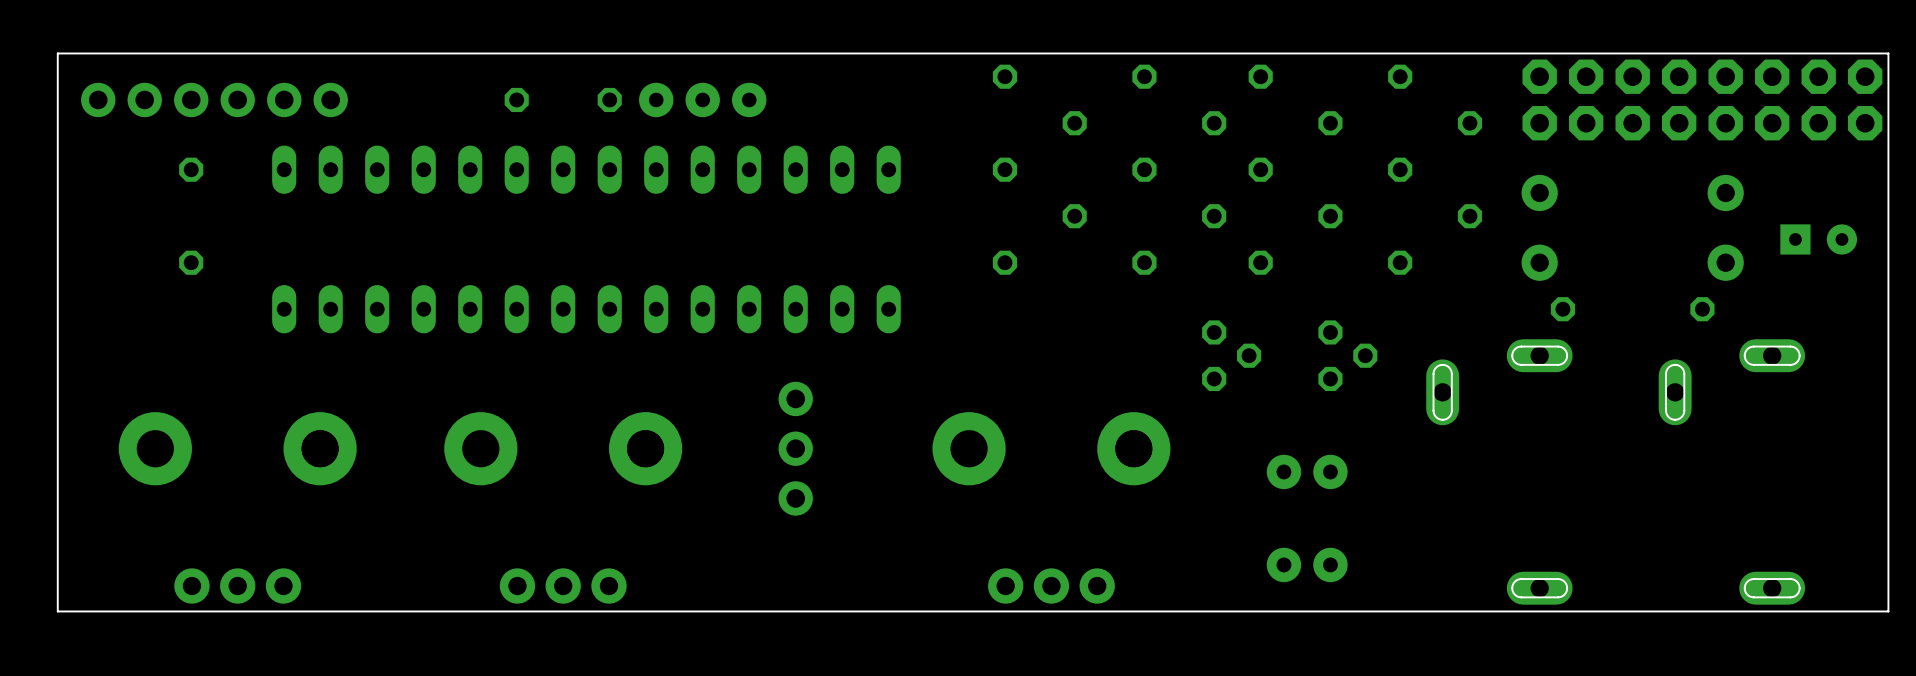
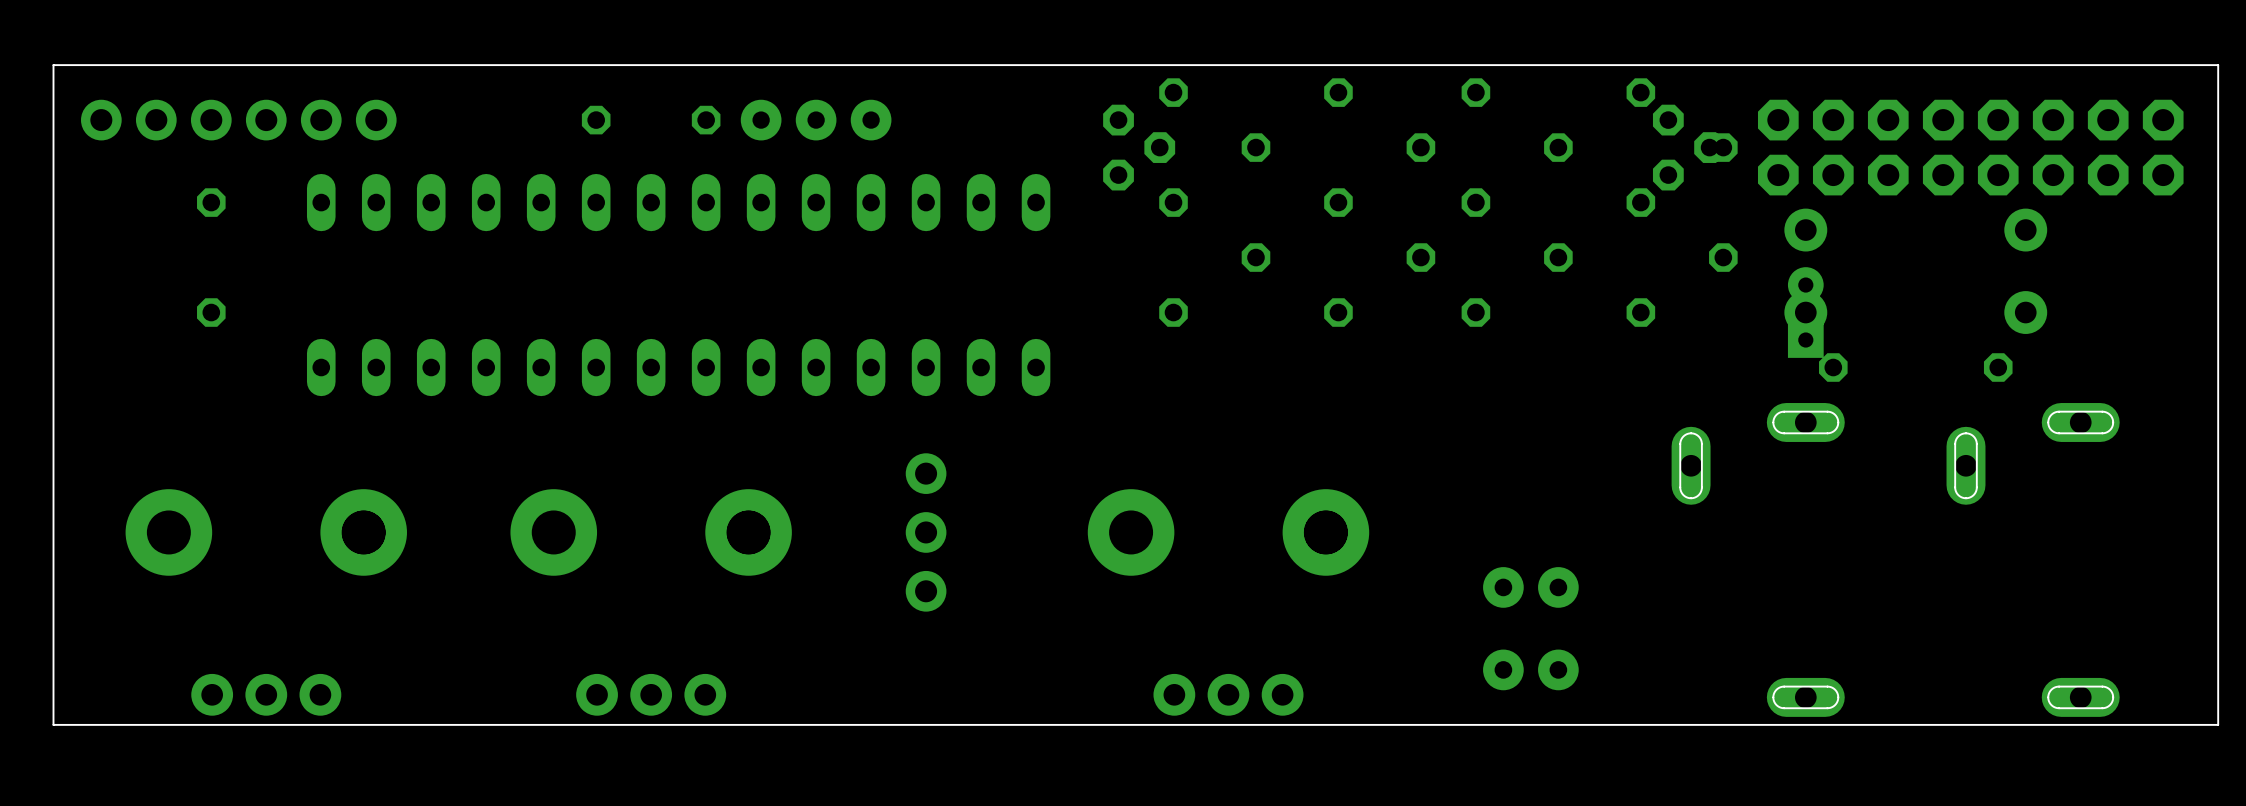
part position: (1702, 99) -> (1970, 147)
part: none -> (1139, 147)
part: none -> (1688, 147)
part rotation: 0° (1818, 239) -> 90° counterclockwise (1805, 312)
part position: (1818, 239) -> (1805, 312)
part: (1231, 355) -> none
part: (1347, 355) -> none
part position: (1307, 471) -> (1530, 587)

